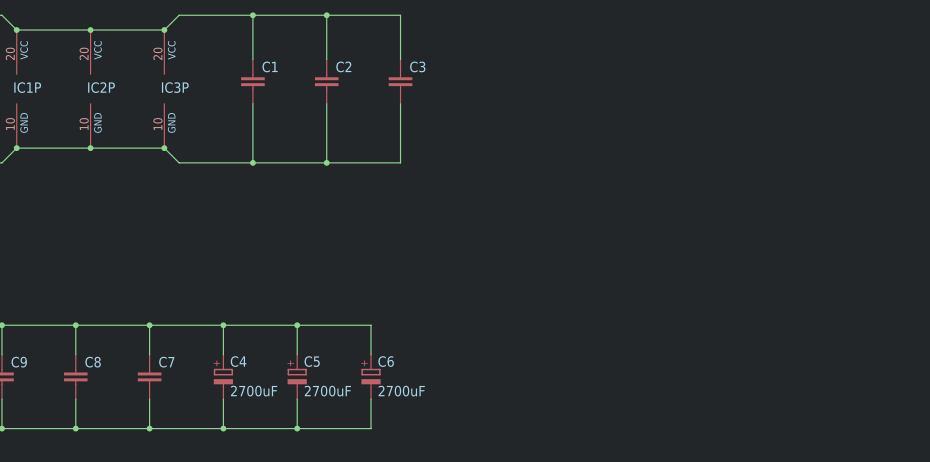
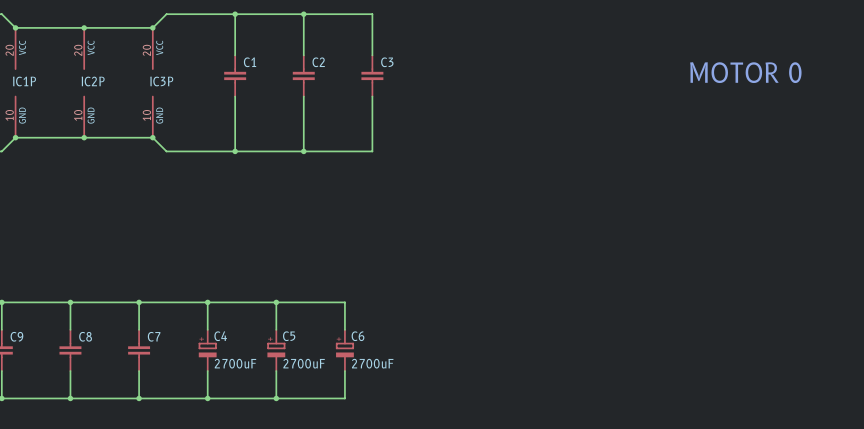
text: none -> MOTOR 0 (745, 72)

